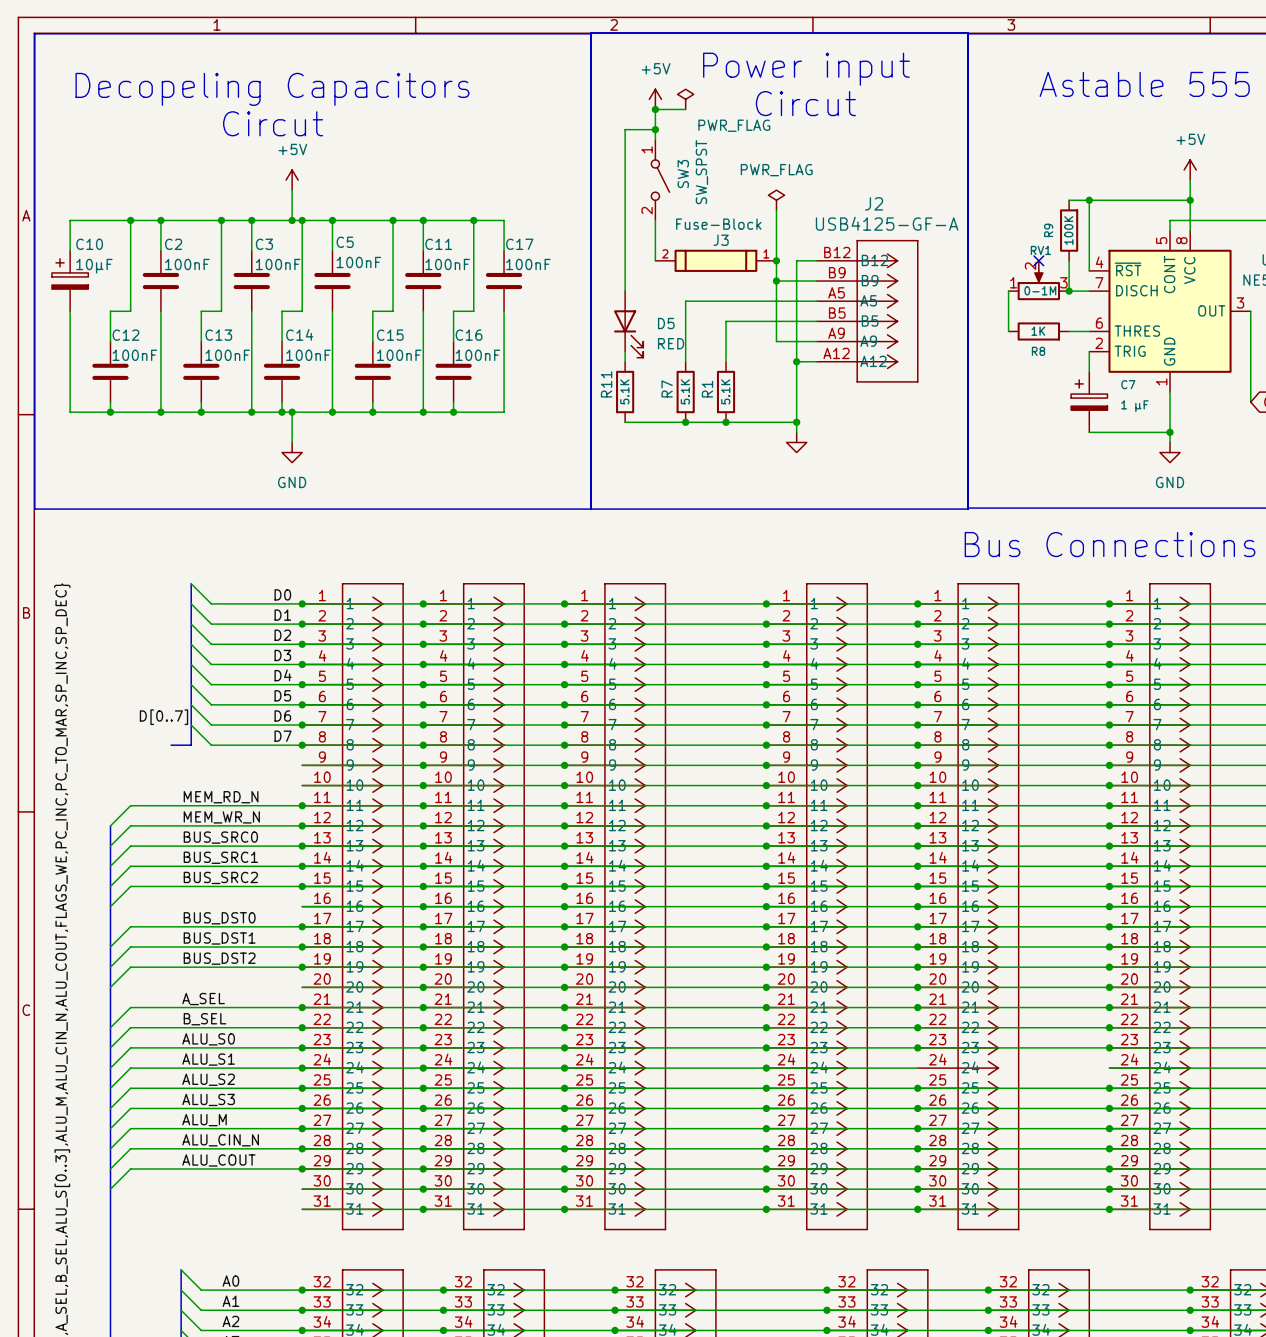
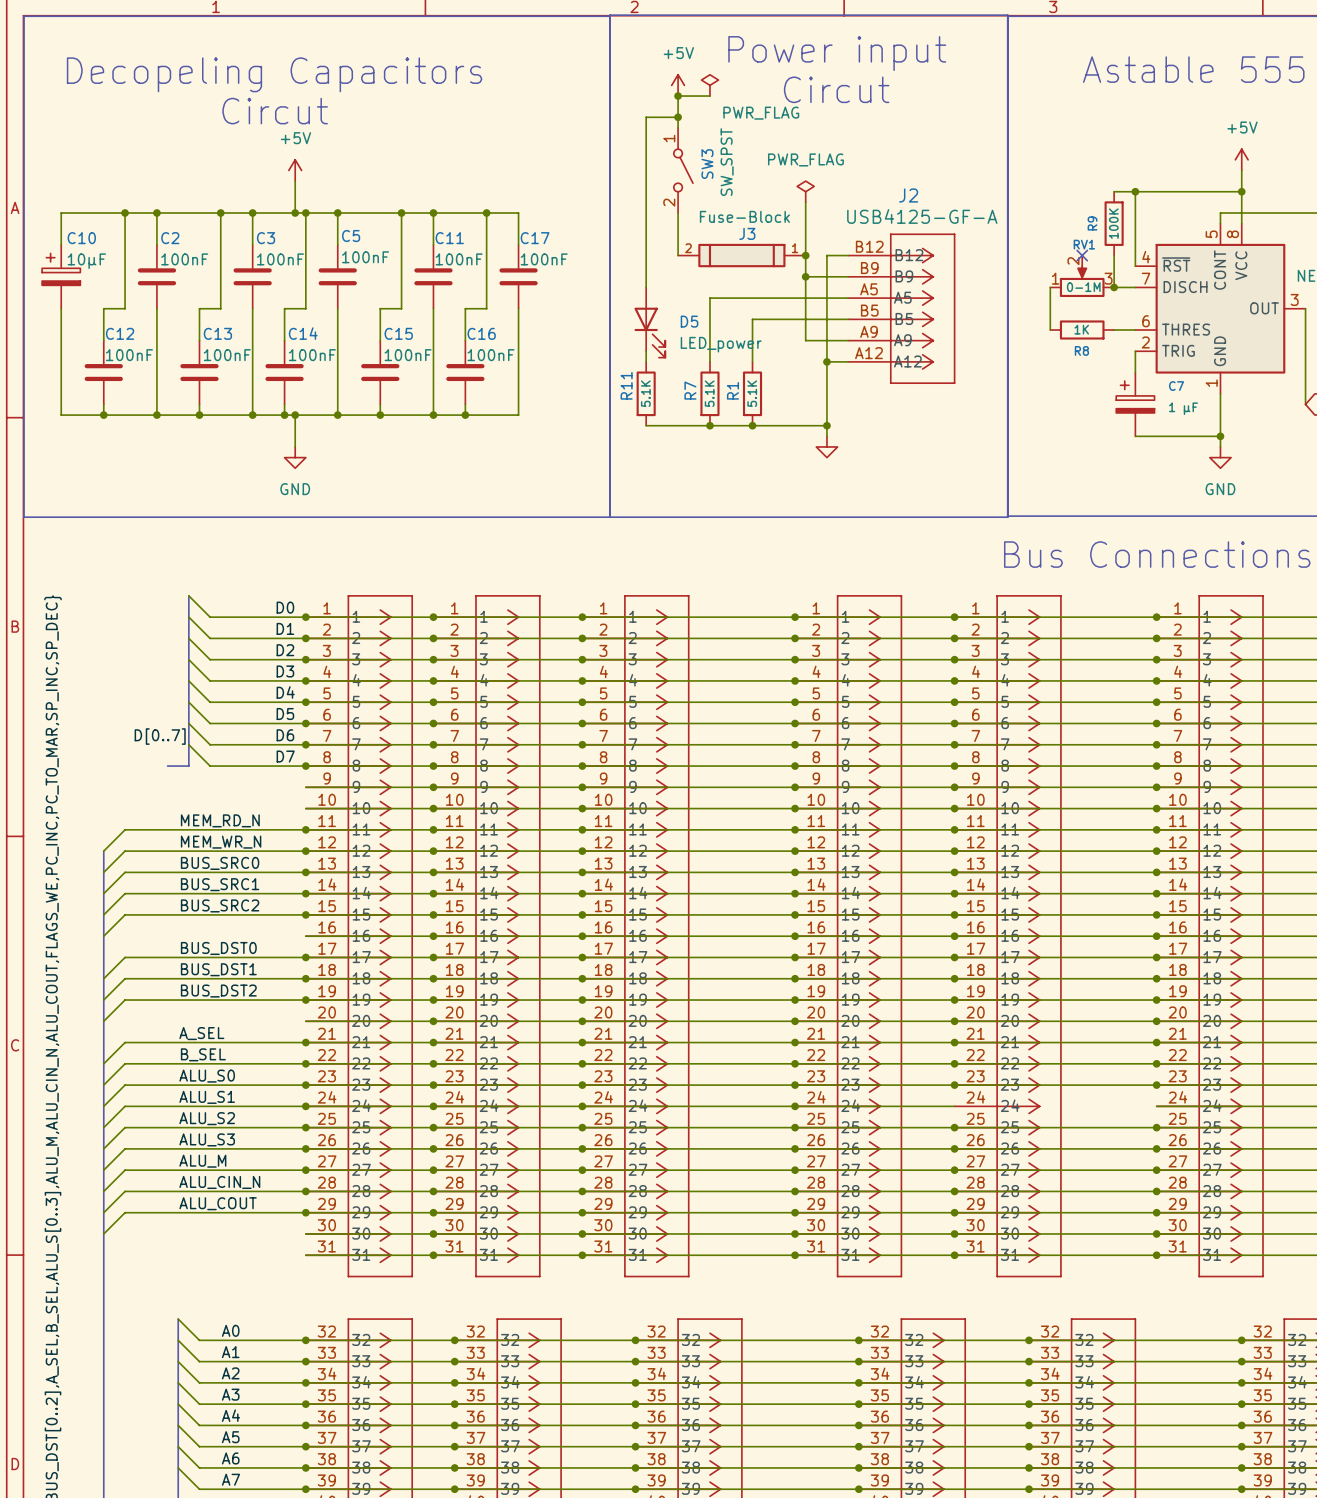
D5 value: RED (671, 343) -> LED_power (721, 344)

